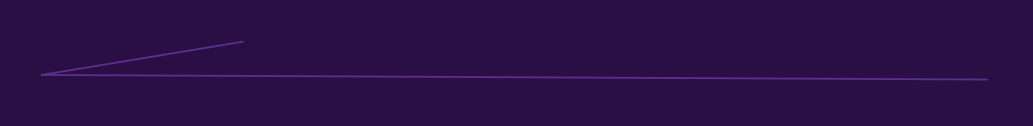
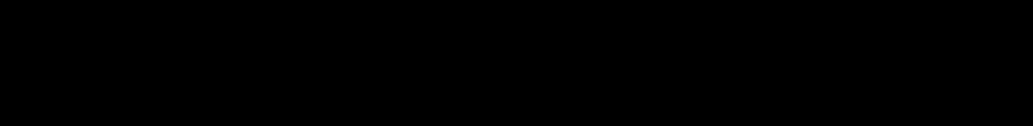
track: (242, 41) (41, 74) (987, 79) -> none

